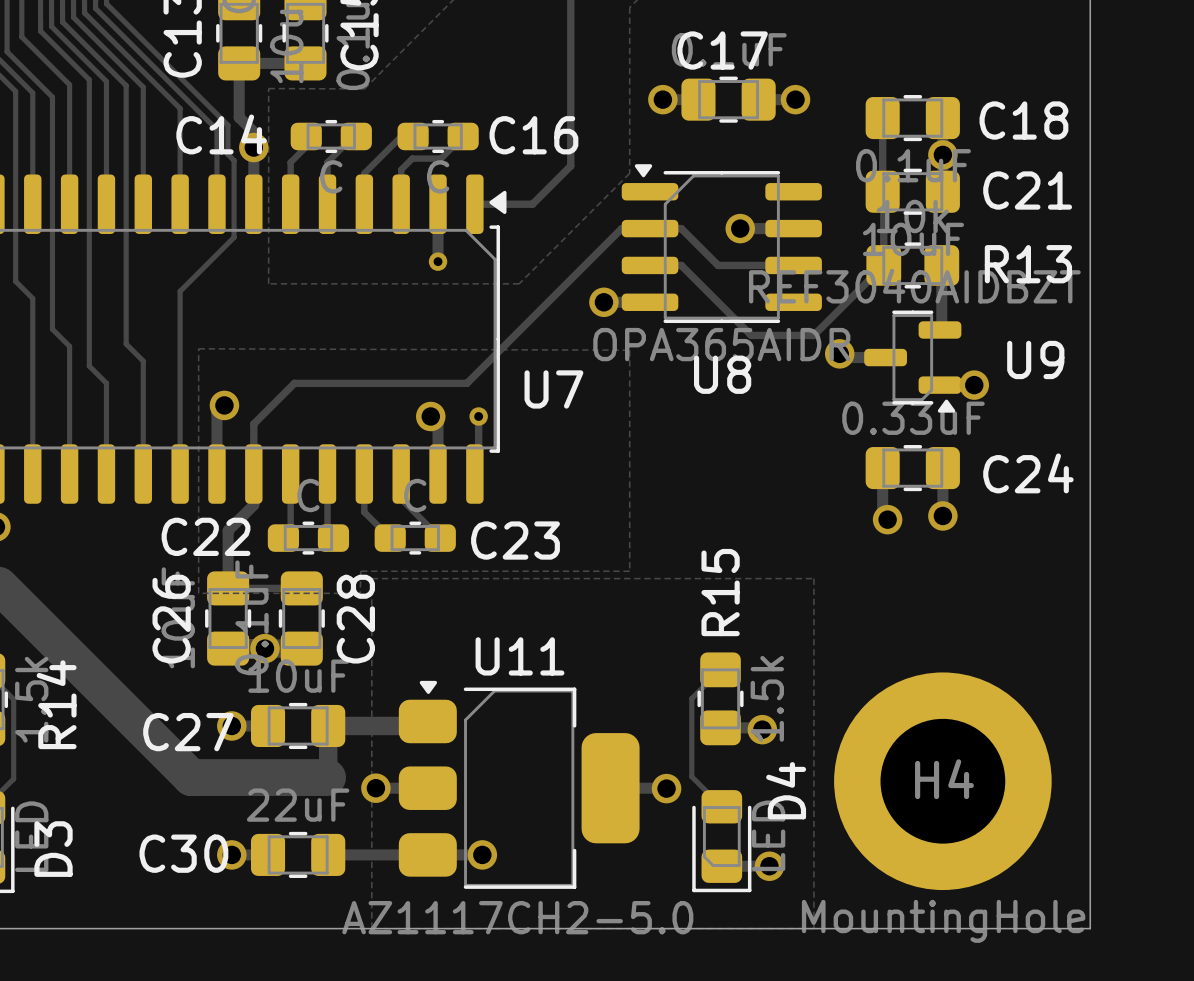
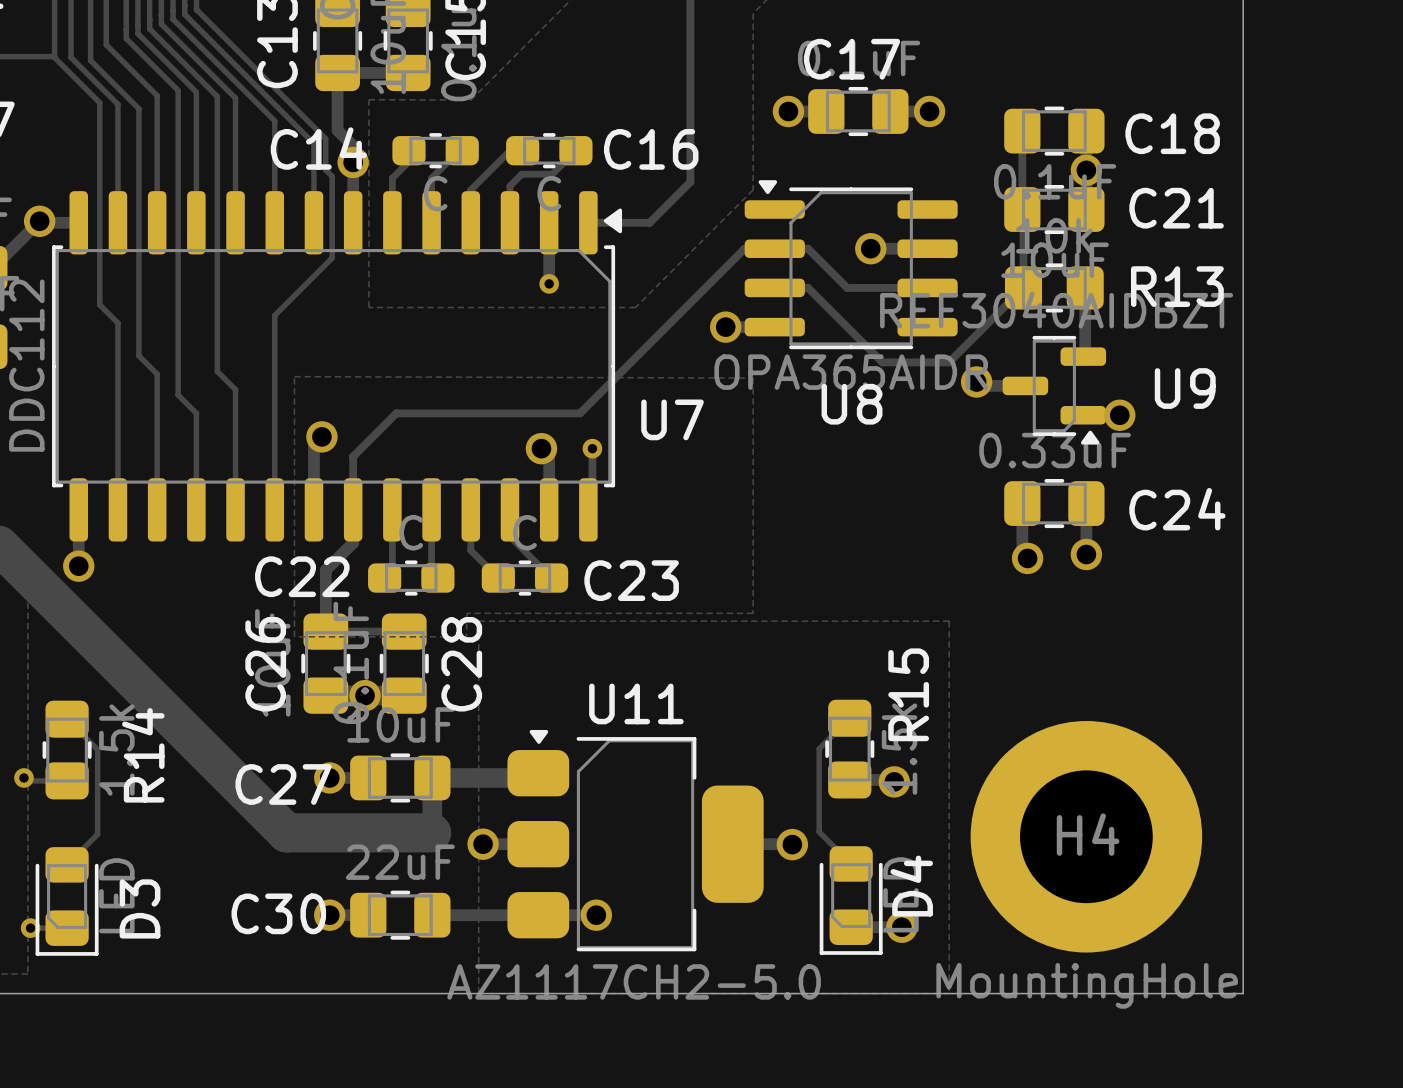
R15 name position: R15 (720, 592) -> R15 (908, 694)
D4 name position: D4 (786, 790) -> D4 (911, 886)

